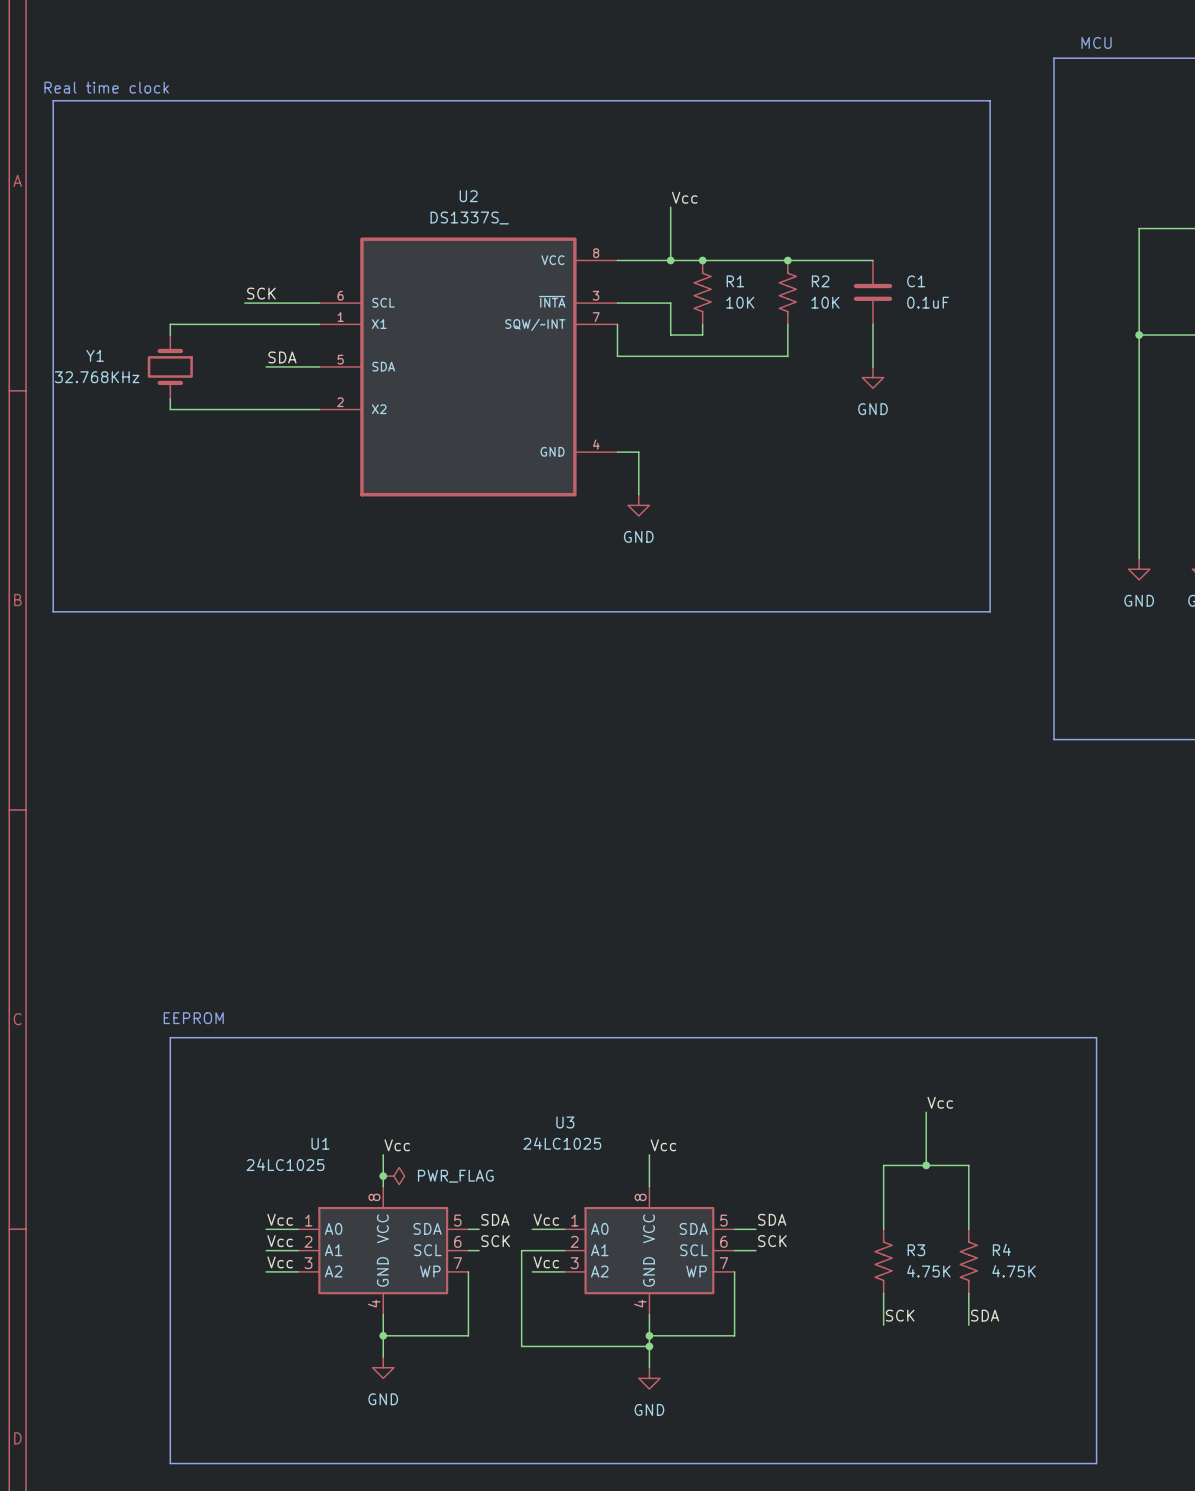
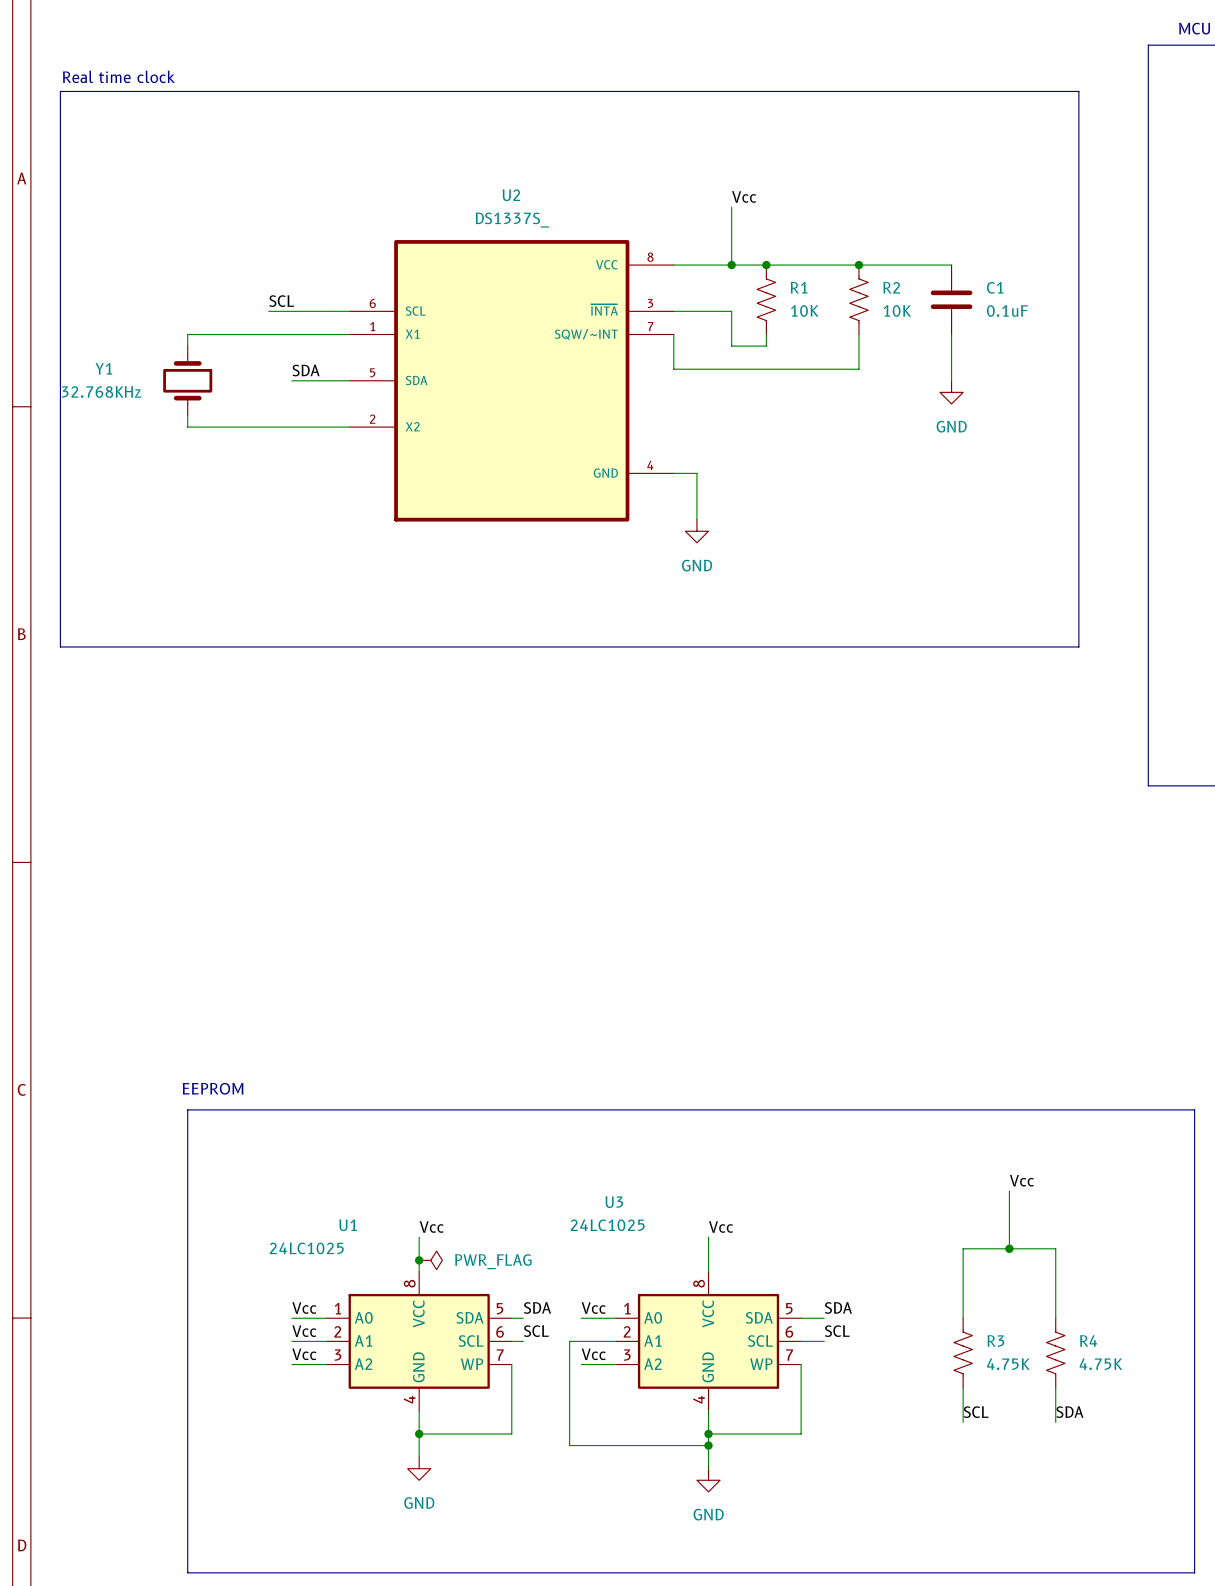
label: SCK (261, 293) -> SCL (281, 301)
label: SCK (495, 1241) -> SCL (536, 1331)
label: SCK (772, 1241) -> SCL (837, 1331)
label: SCK (900, 1315) -> SCL (976, 1412)

